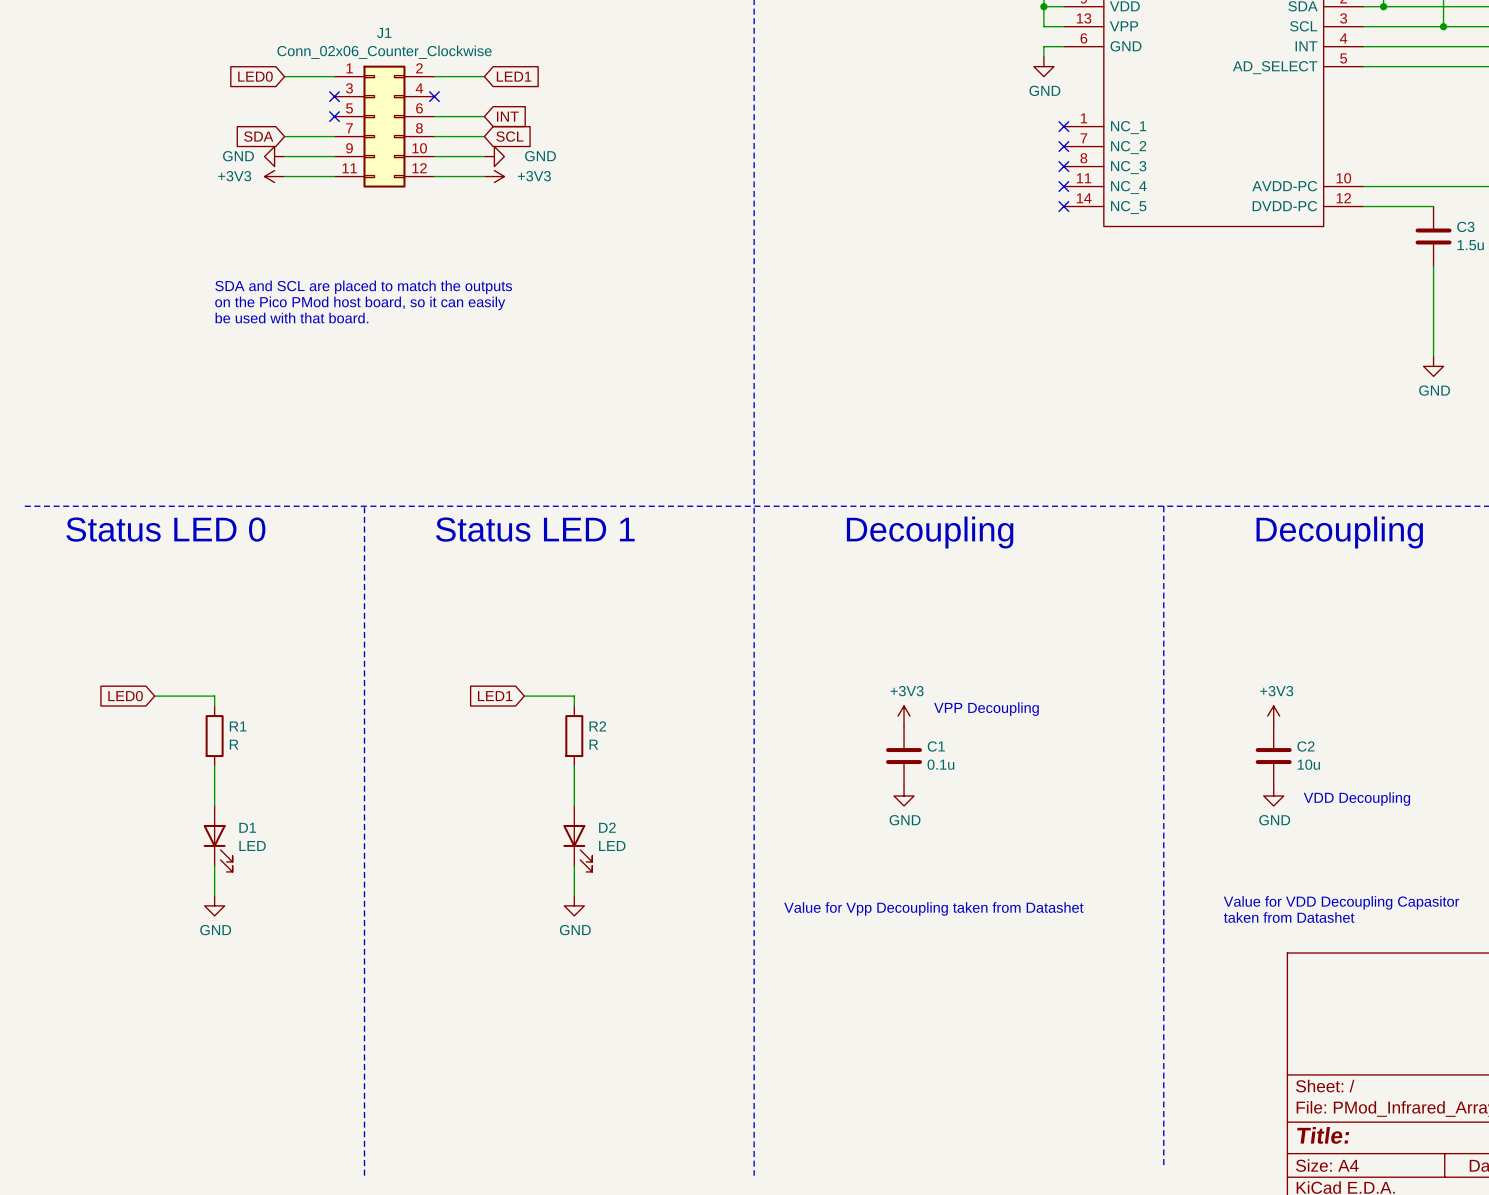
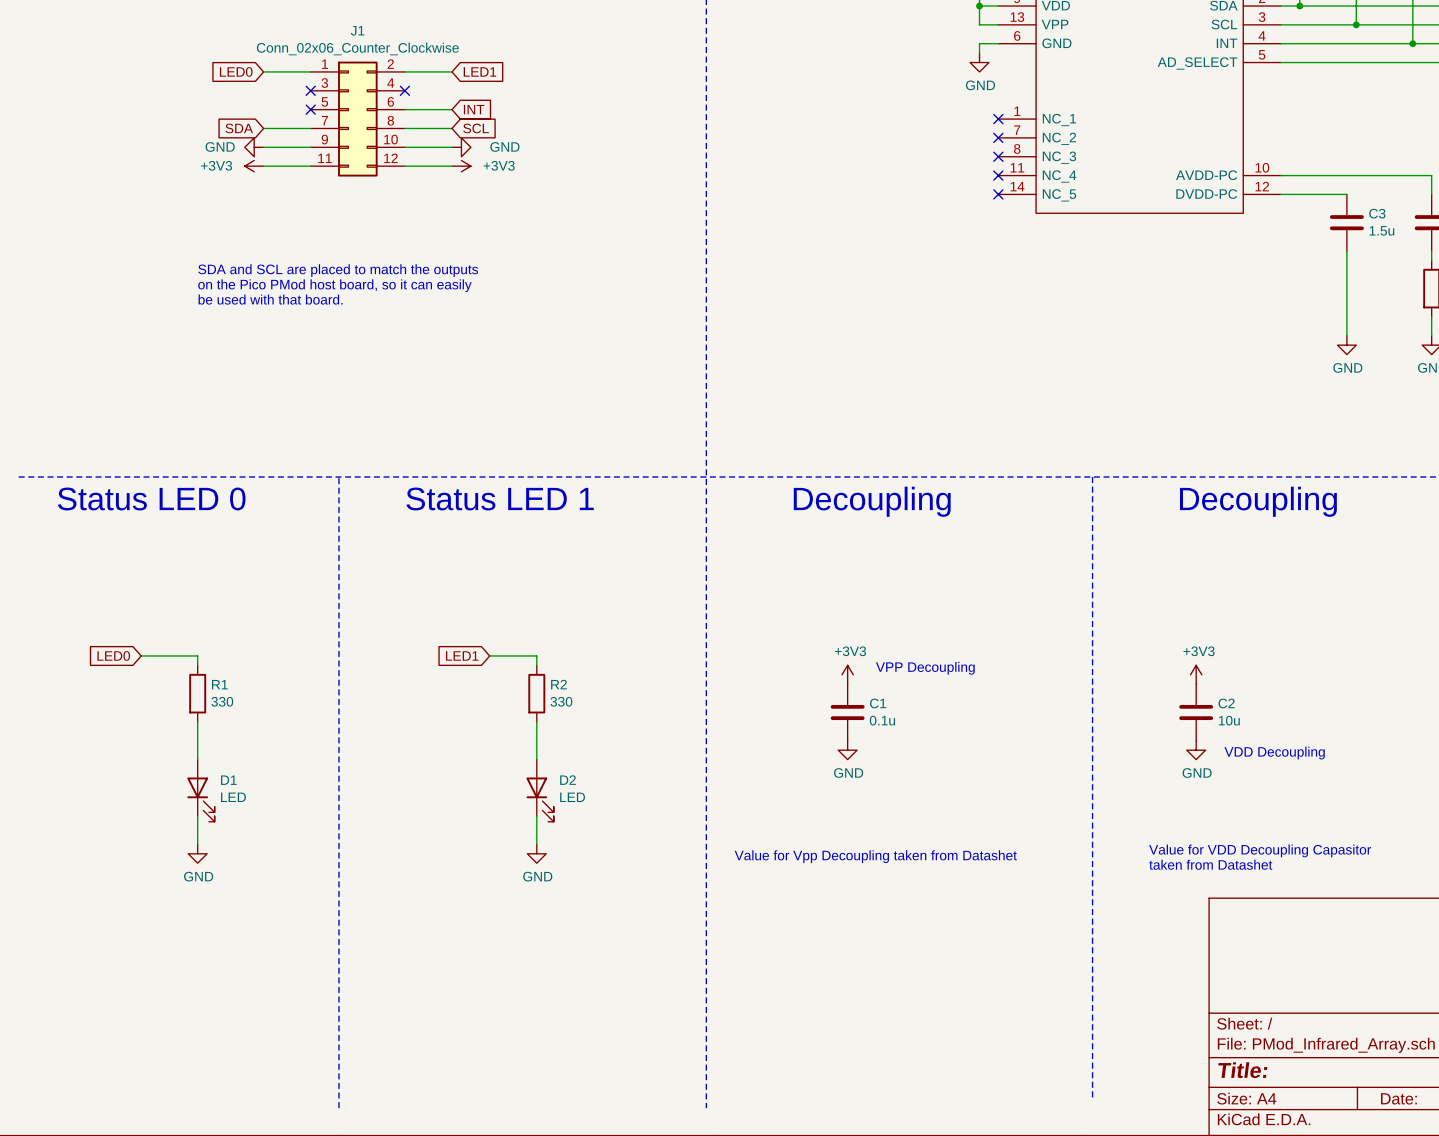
R1 value: R (234, 744) -> 330 (222, 701)
R2 value: R (593, 744) -> 330 (561, 701)

